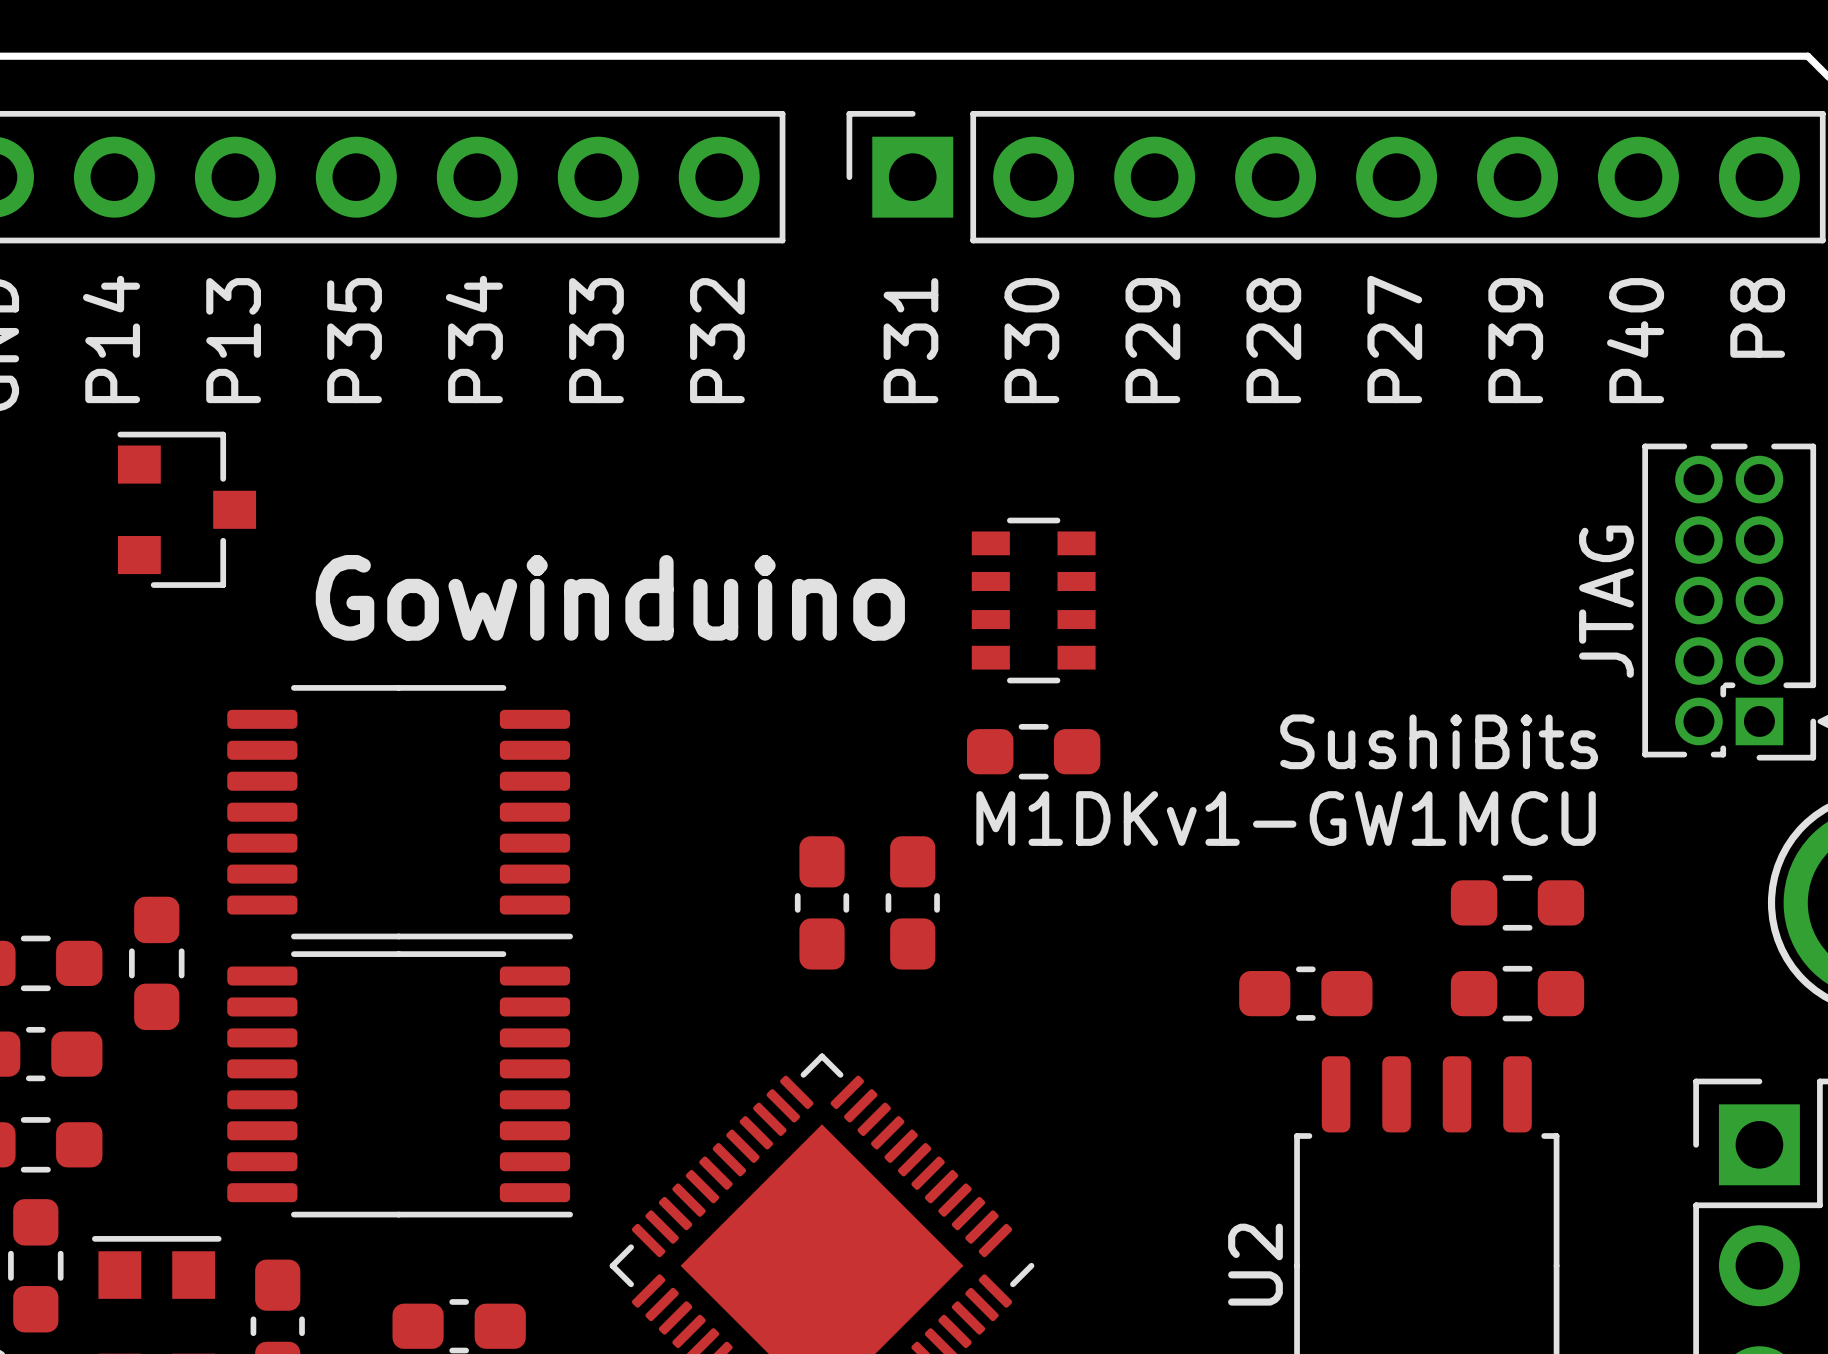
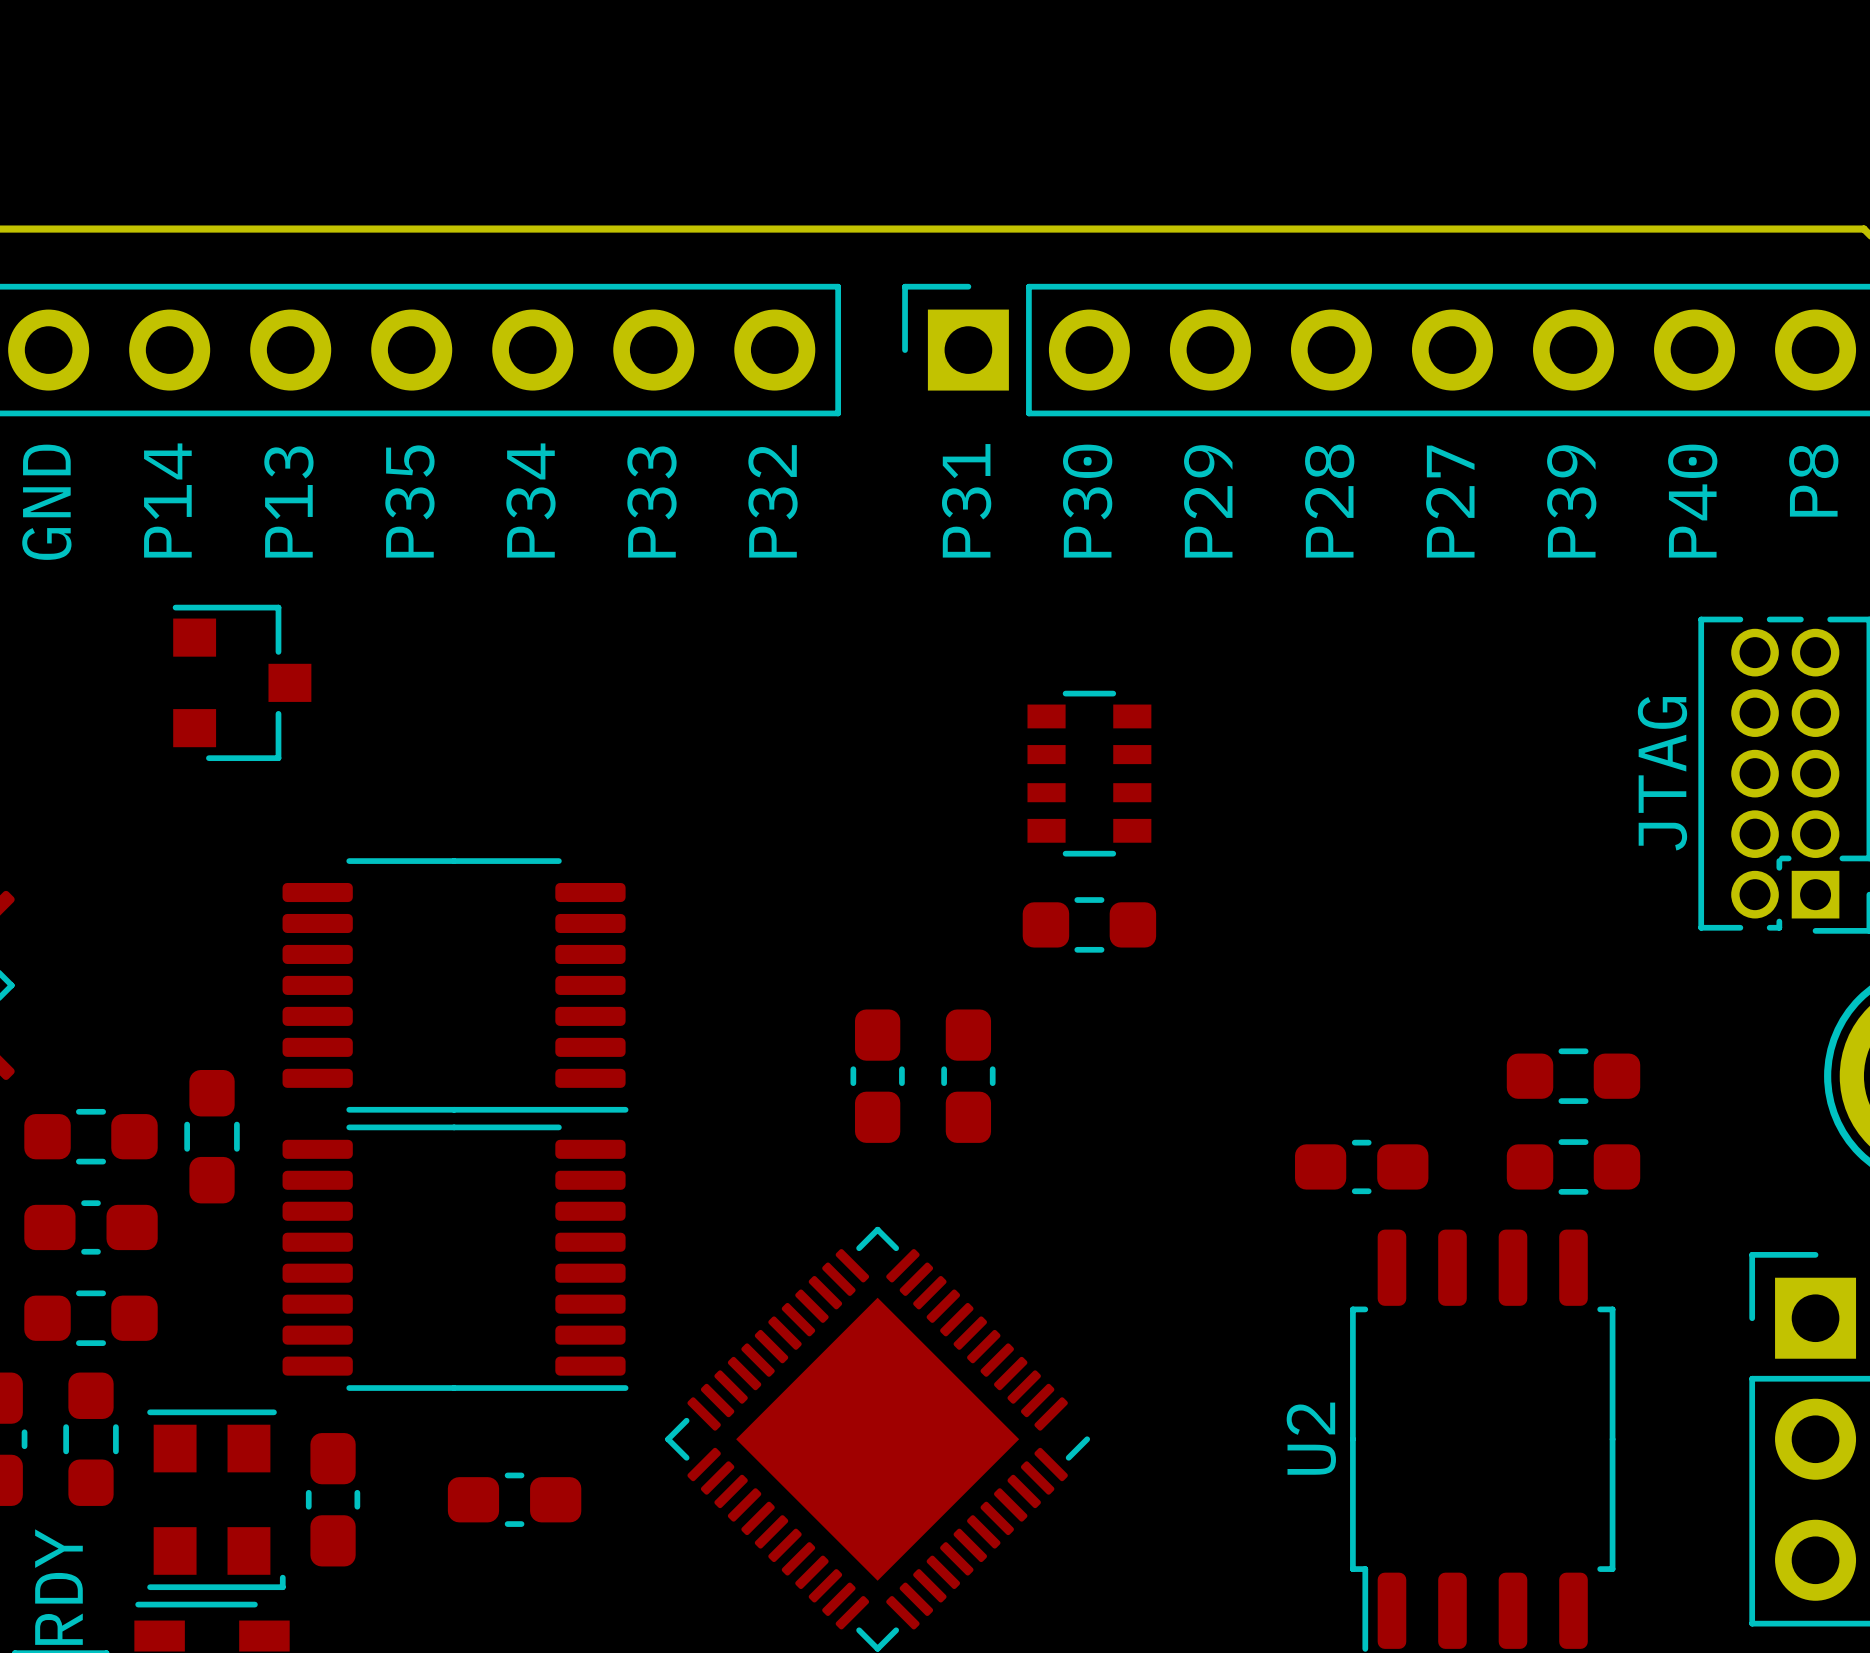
text: Gowinduino (610, 597) -> none
text: SushiBits (1439, 741) -> none
text: M1DKv1-GW1MCU (1286, 818) -> none

